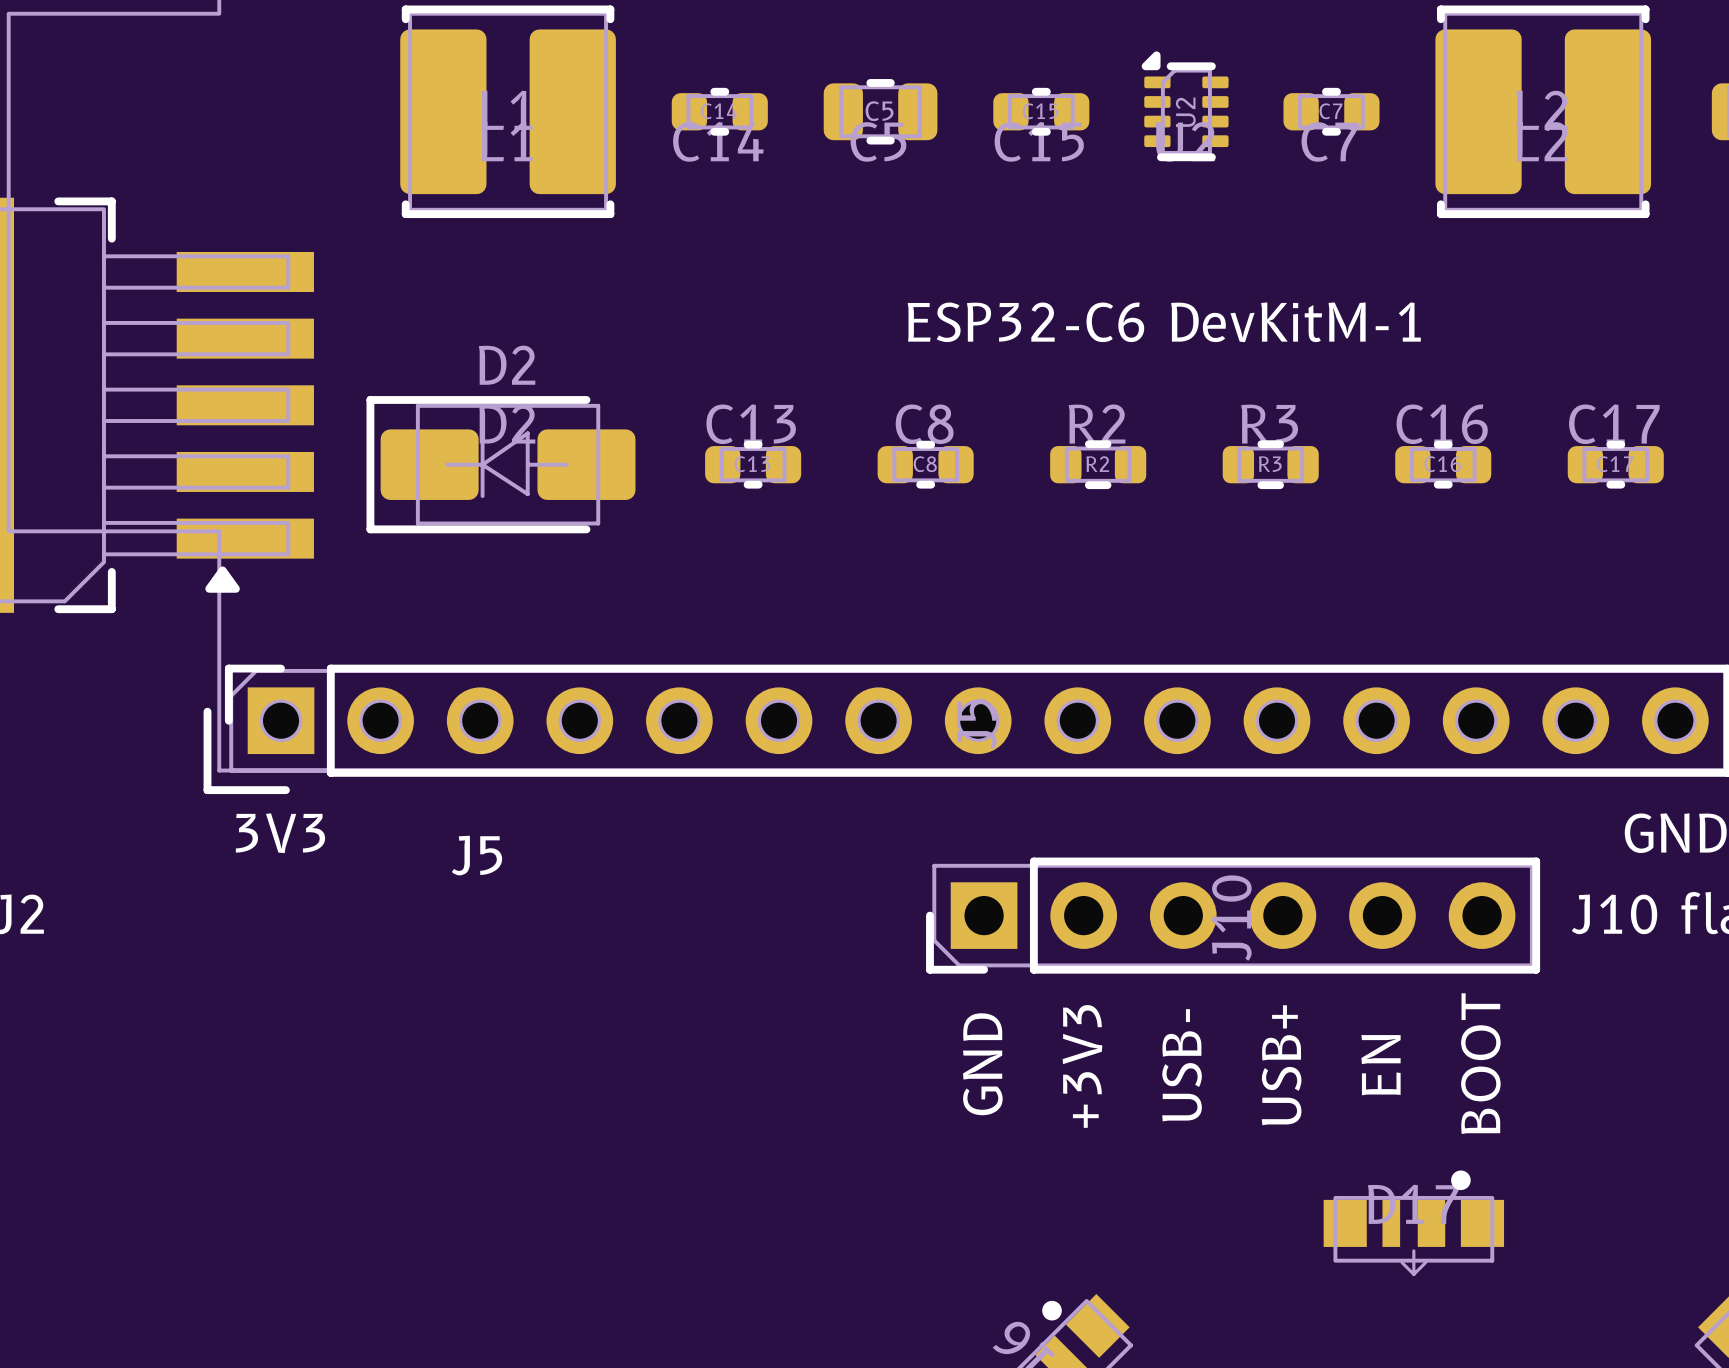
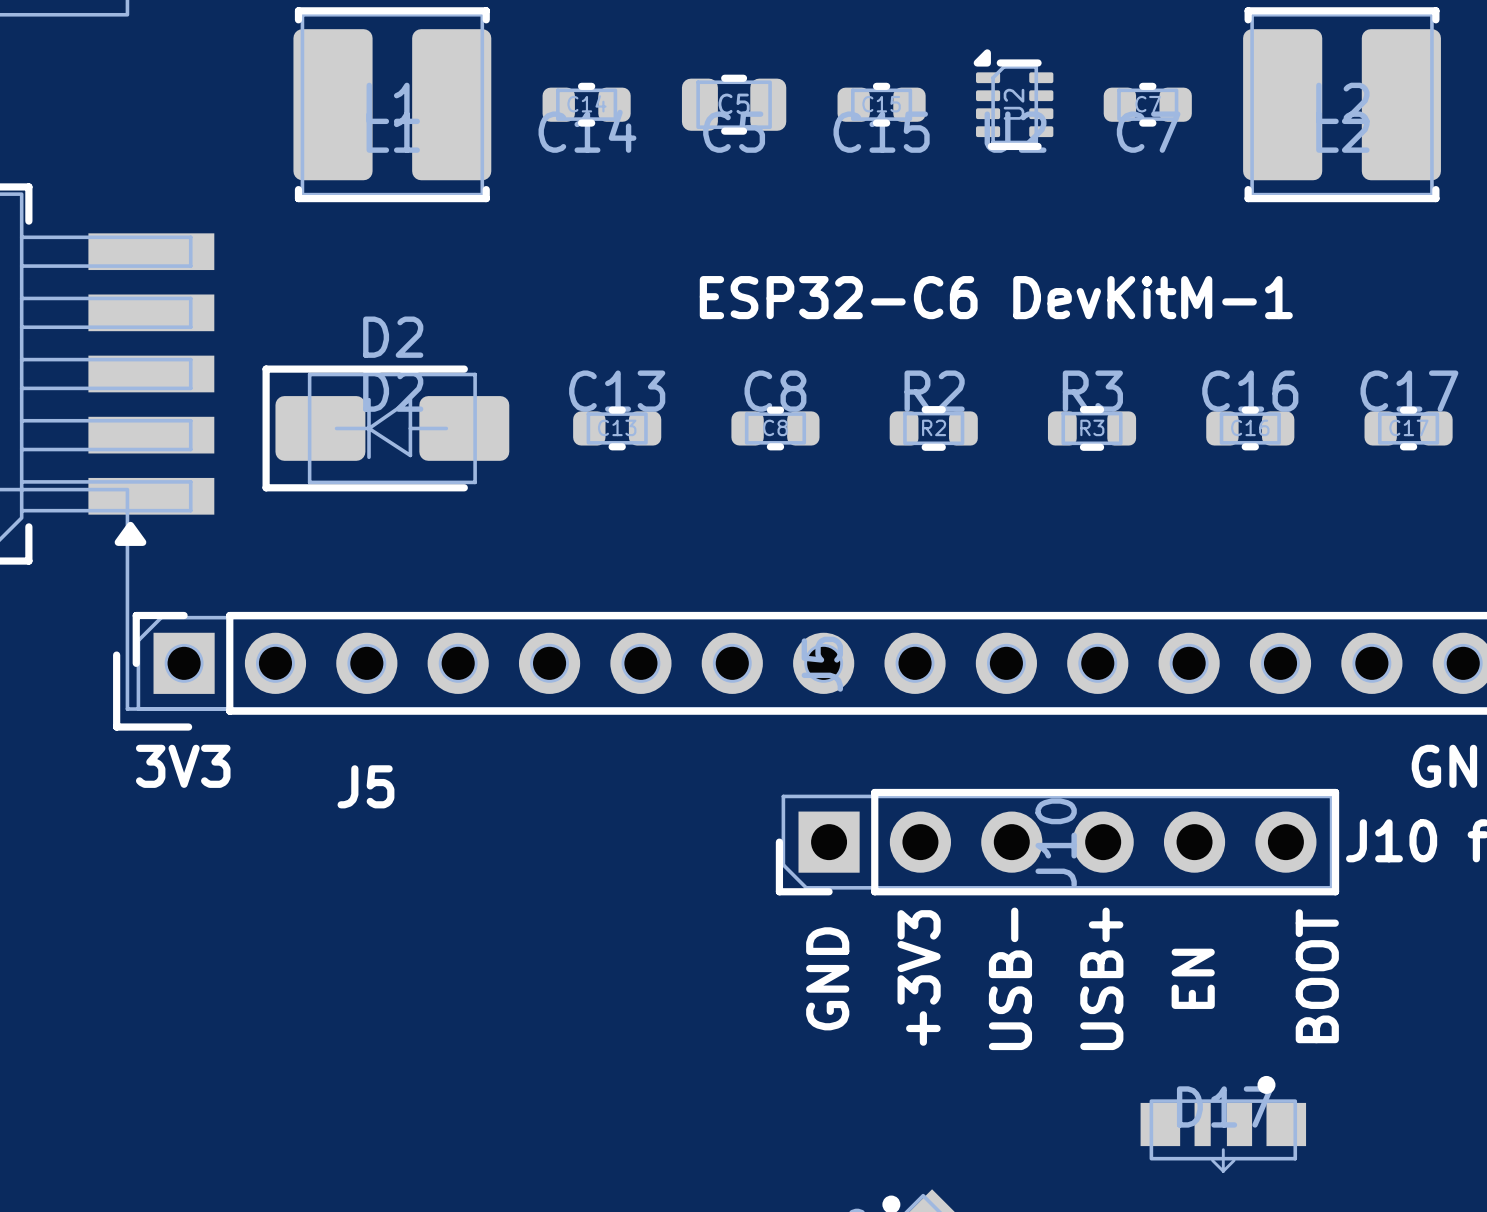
text position: BOOT (1480, 1063) -> BOOT (1317, 976)

